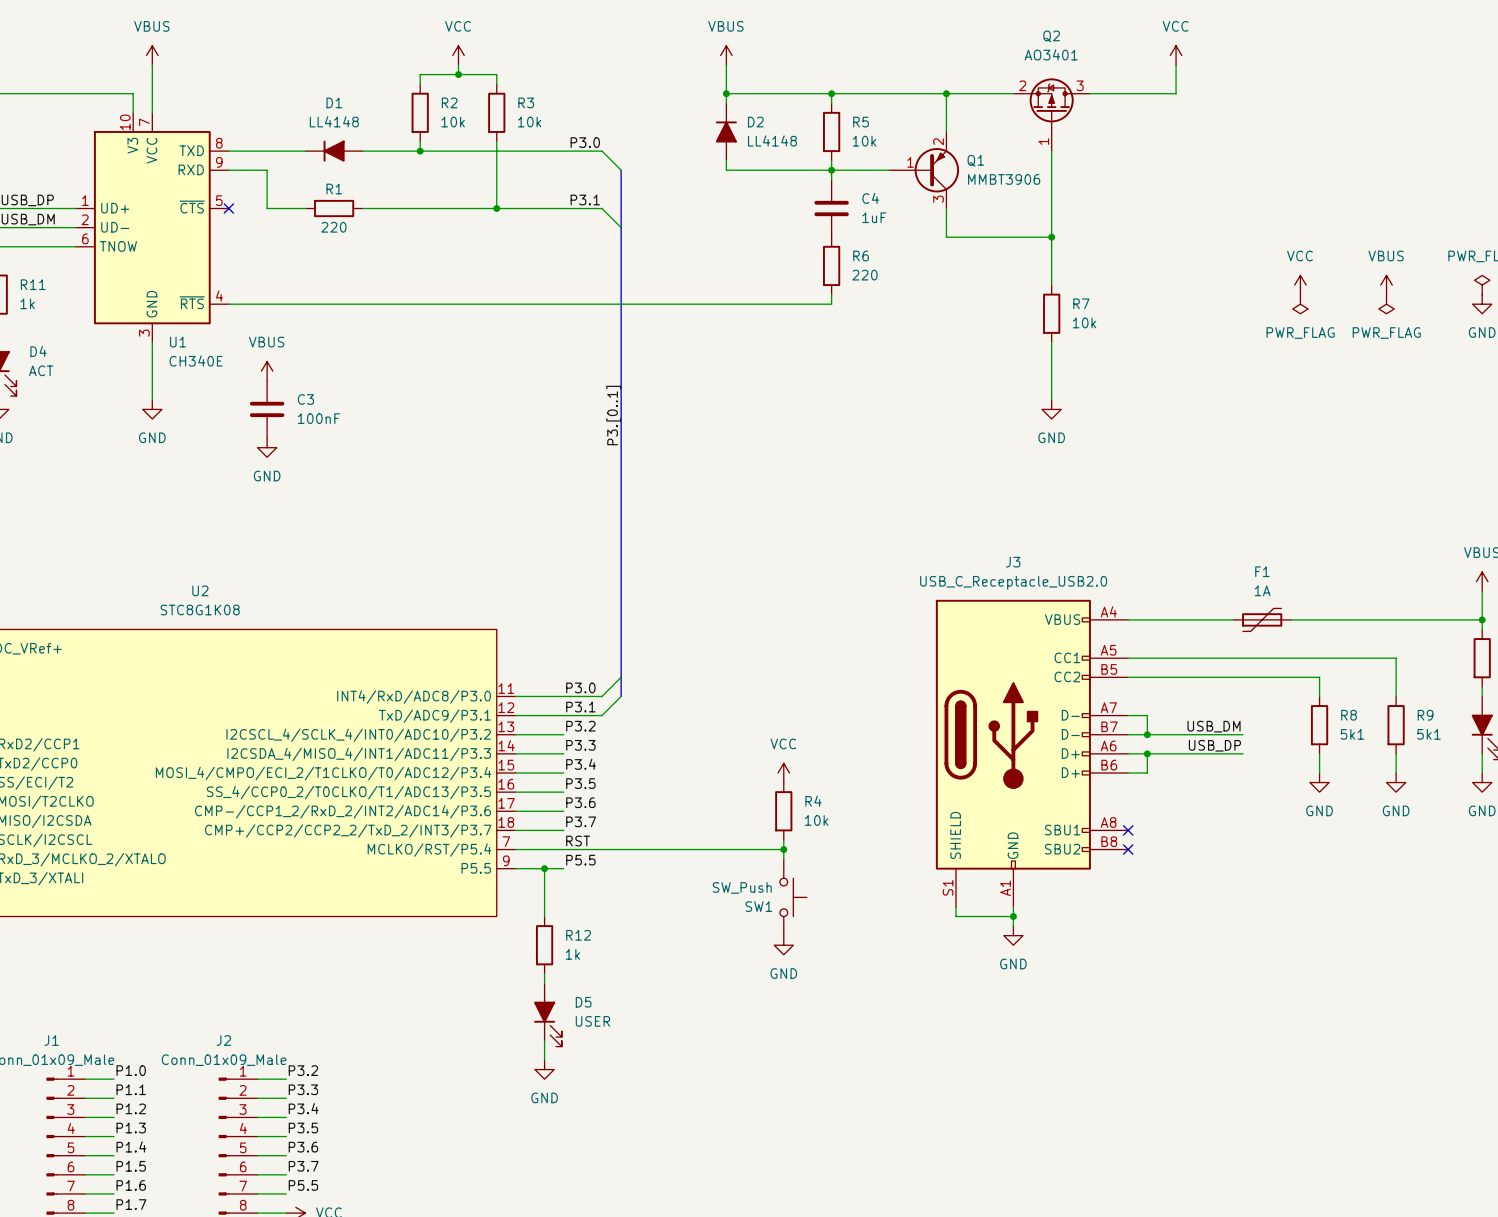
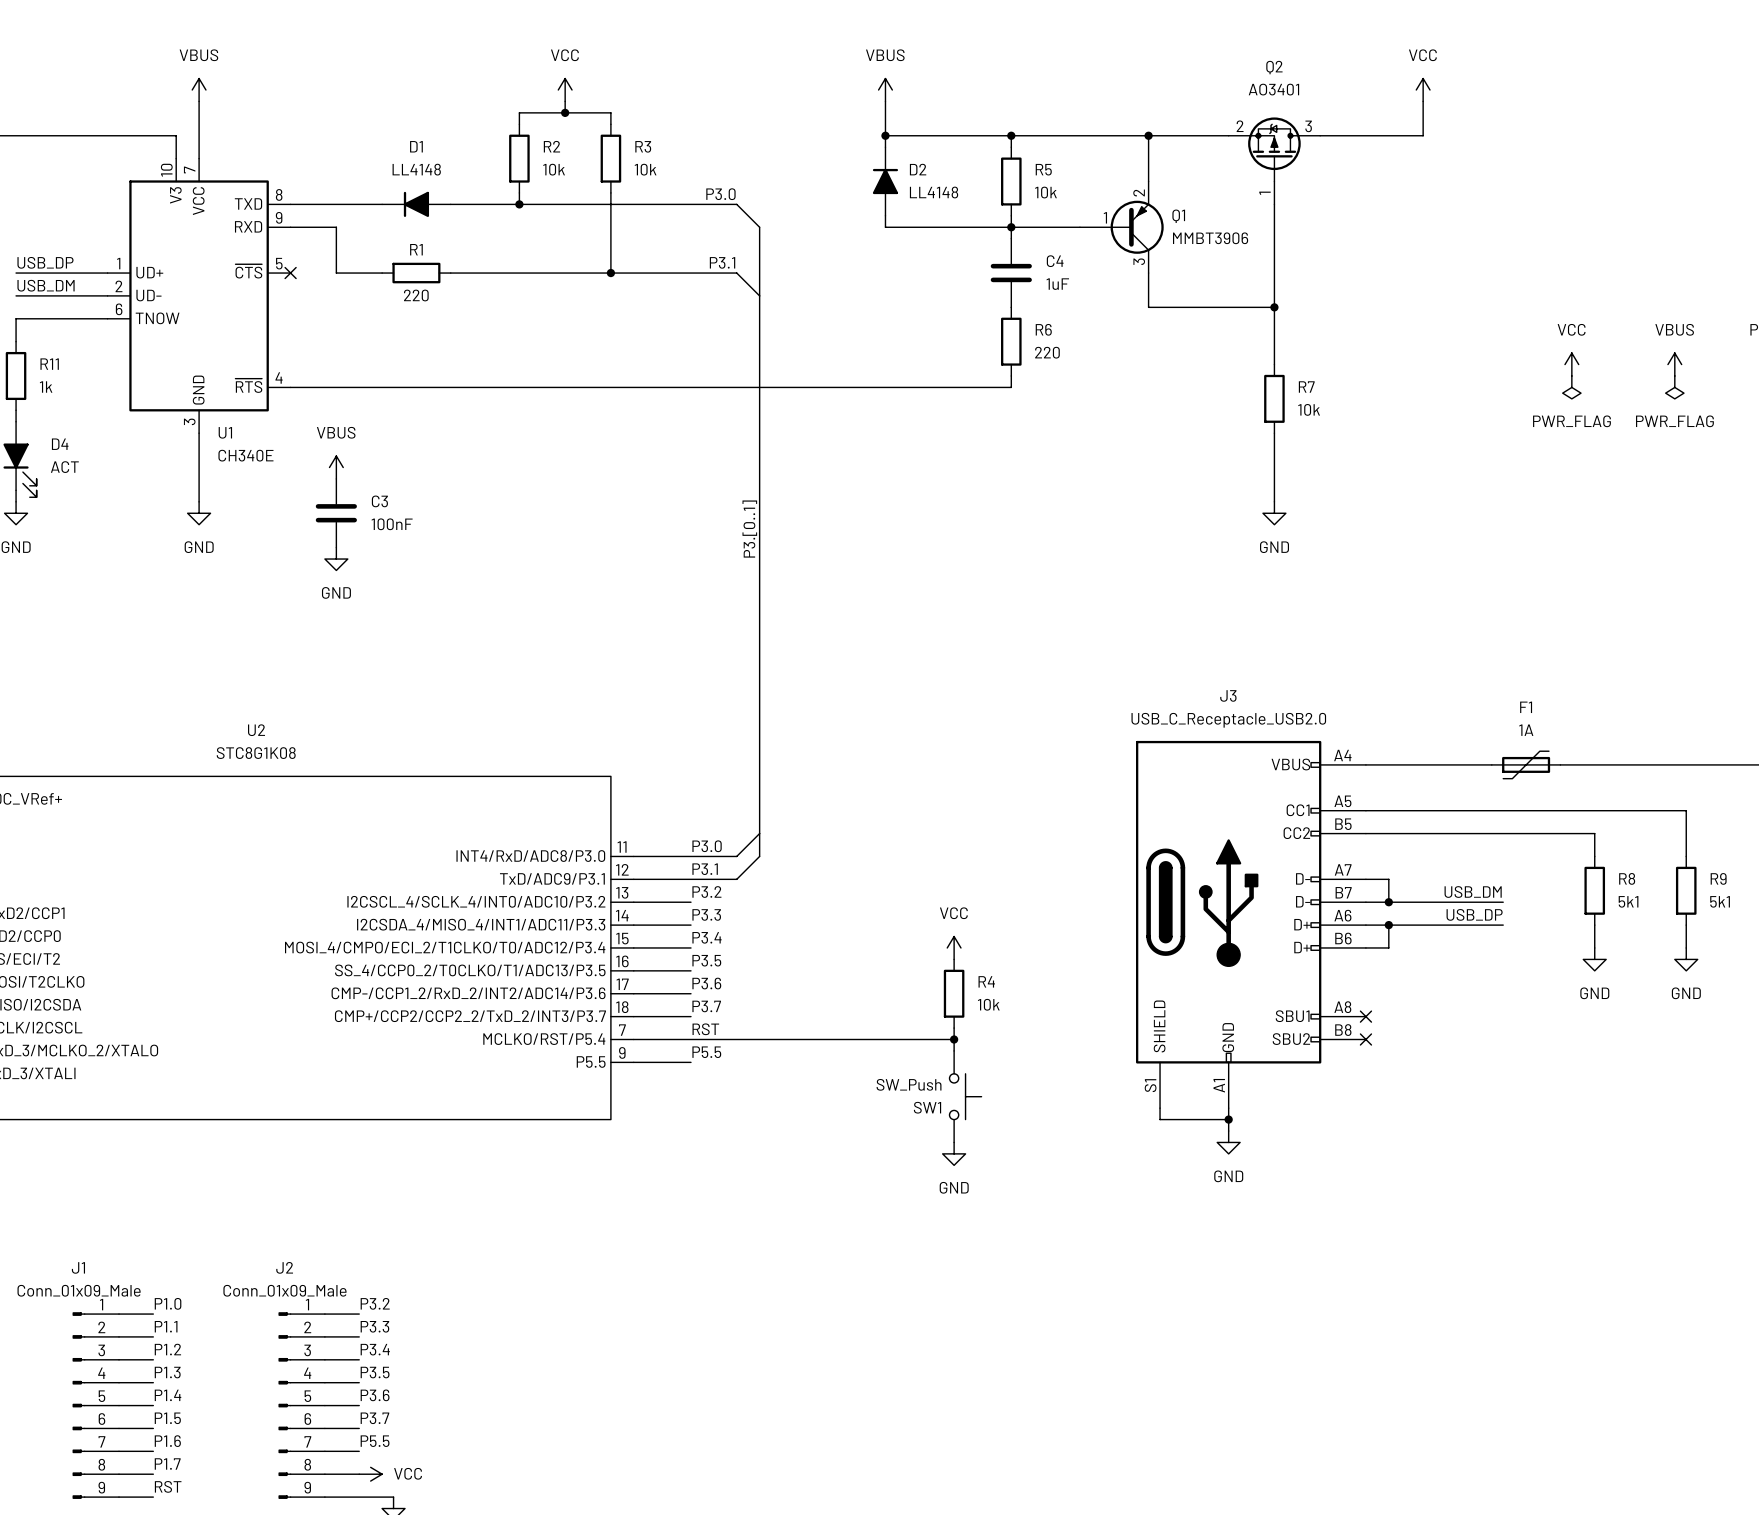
wire: (544, 868) (544, 916) -> none
junction: (544, 868) -> none
R12: 1k (544, 945) -> none
wire: (544, 973) (544, 983) -> none
D5: USER (547, 1015) -> none
wire: (544, 1040) (544, 1060) -> none
power symbol: GND (544, 1069) -> none

